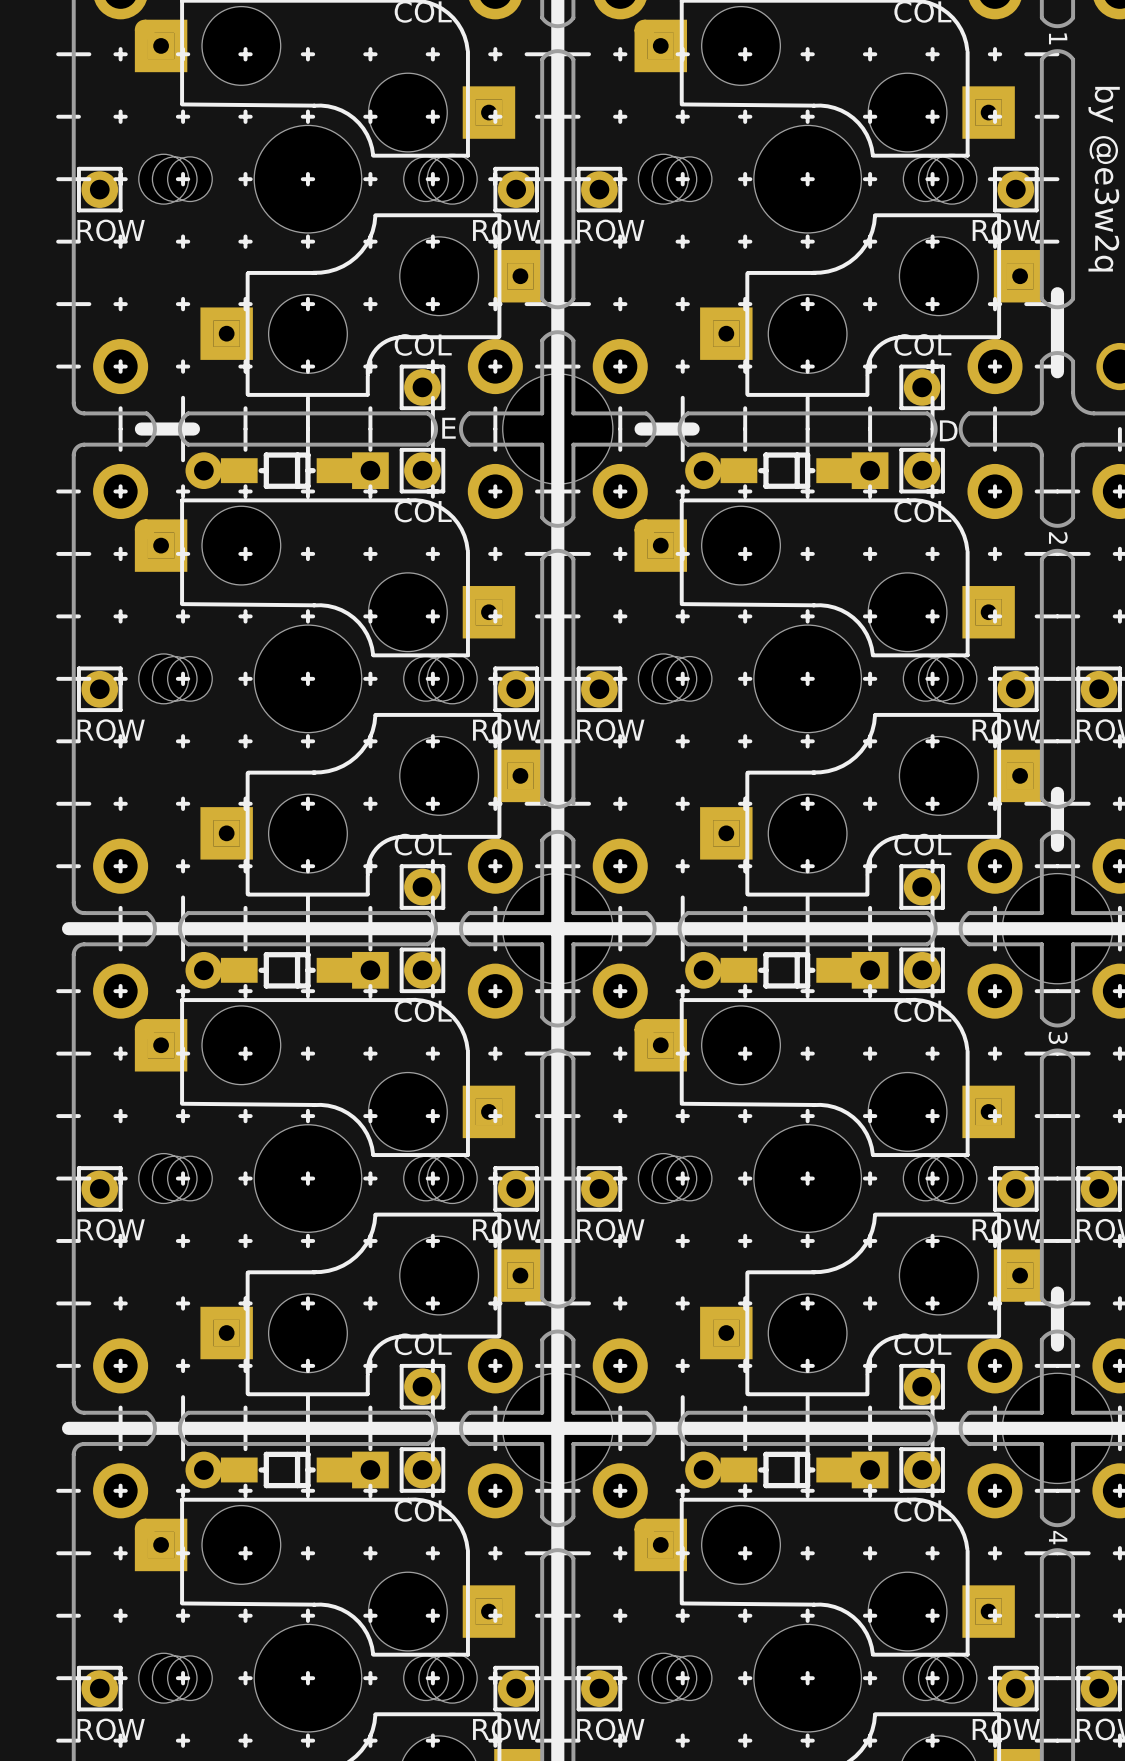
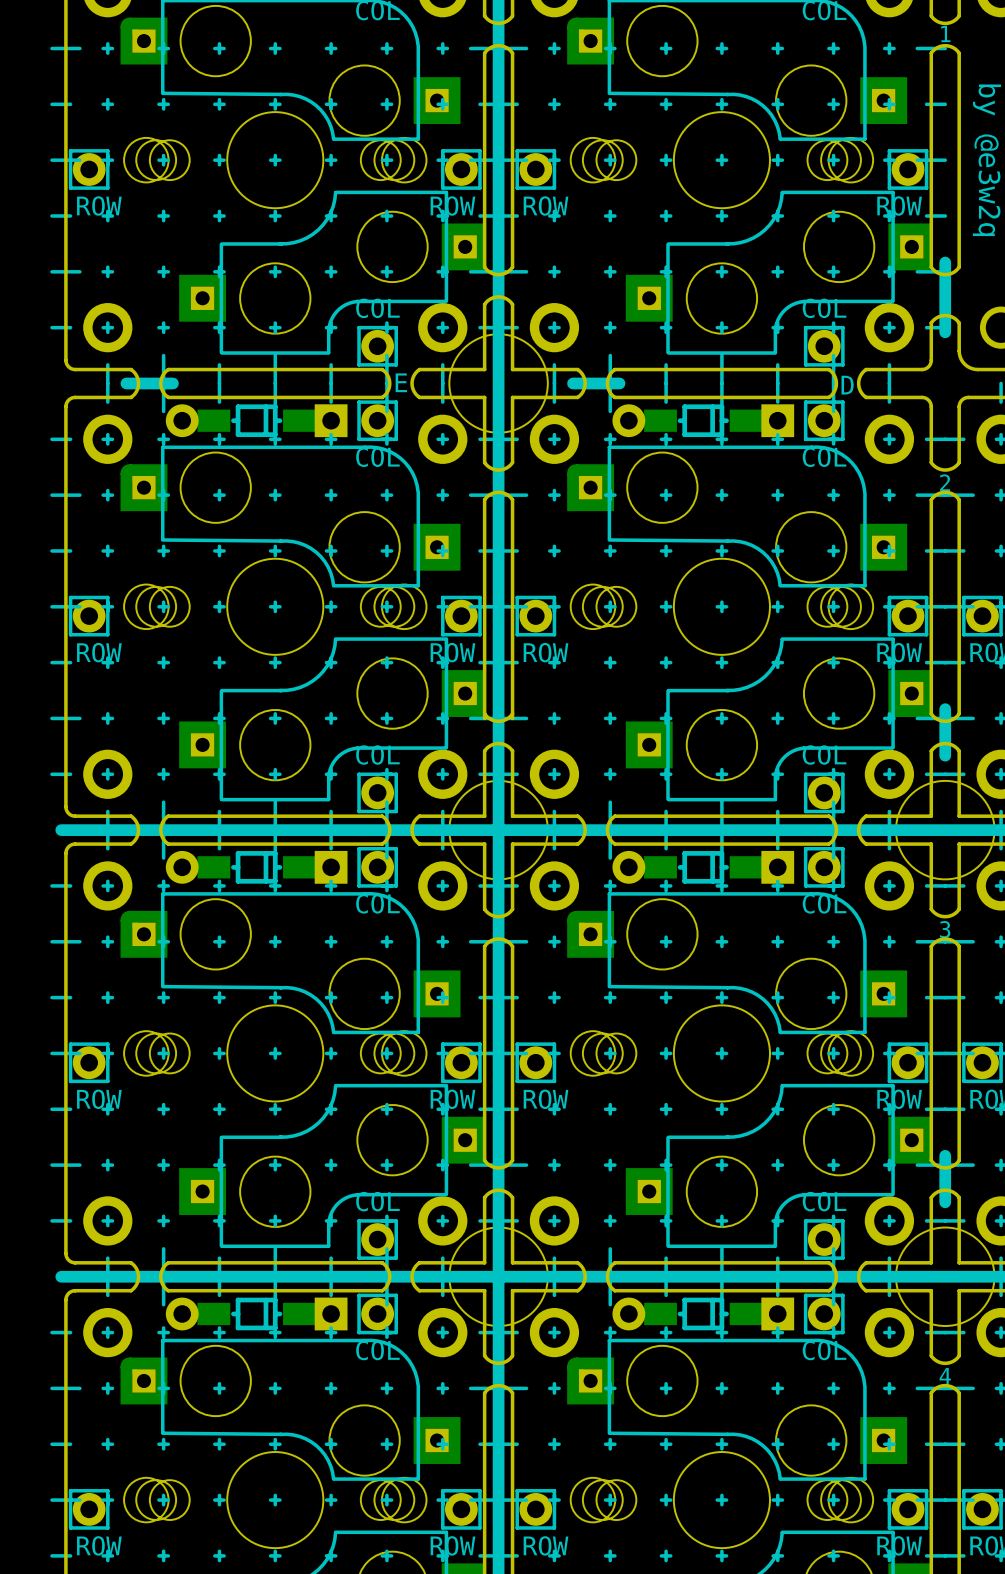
text rotation: 0° (1058, 38) -> 90° counterclockwise (945, 33)
text rotation: 0° (1058, 537) -> 90° counterclockwise (945, 482)
text rotation: 0° (1058, 1037) -> 90° counterclockwise (945, 929)
text rotation: 0° (1058, 1537) -> 90° counterclockwise (945, 1376)

